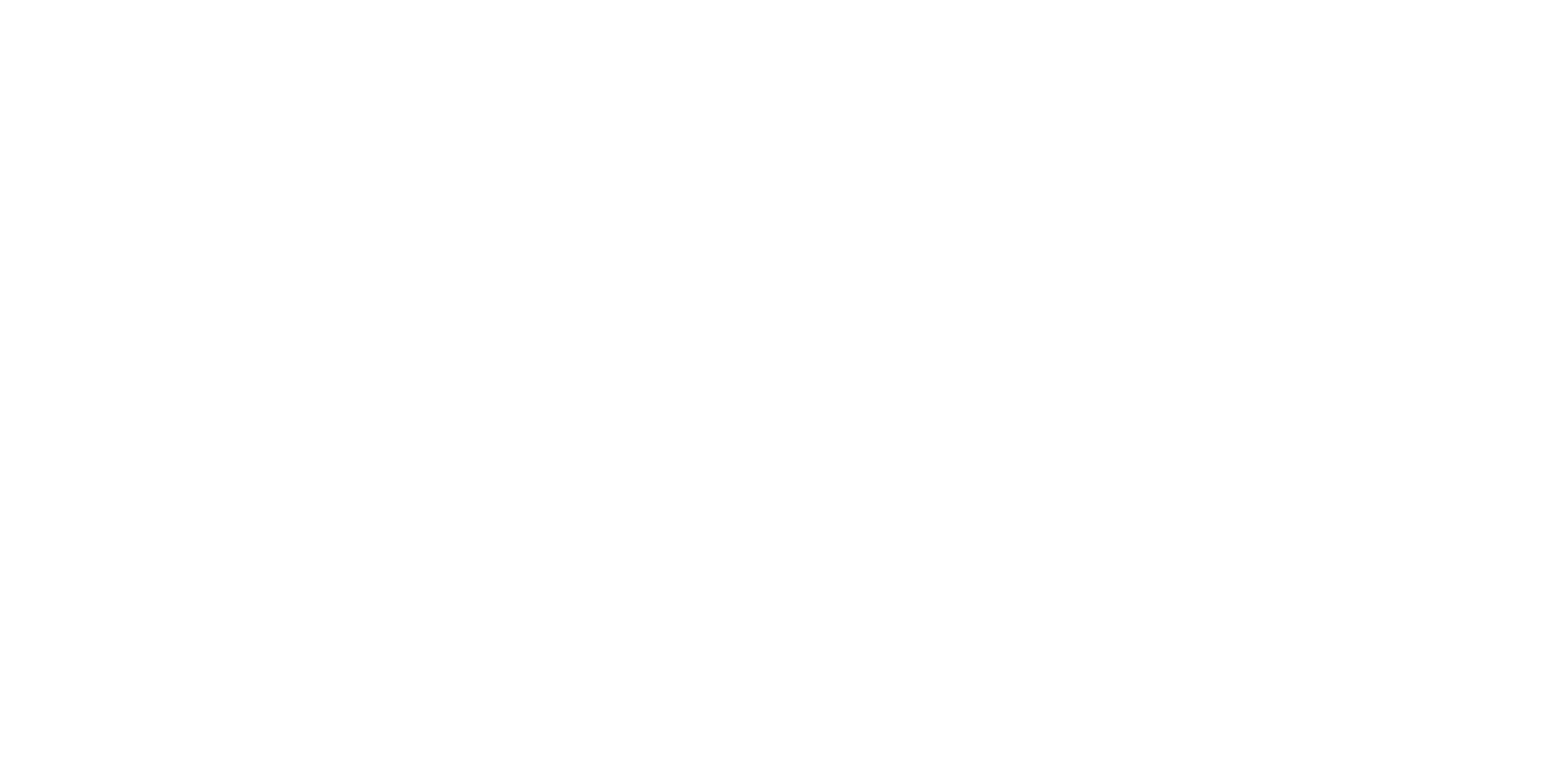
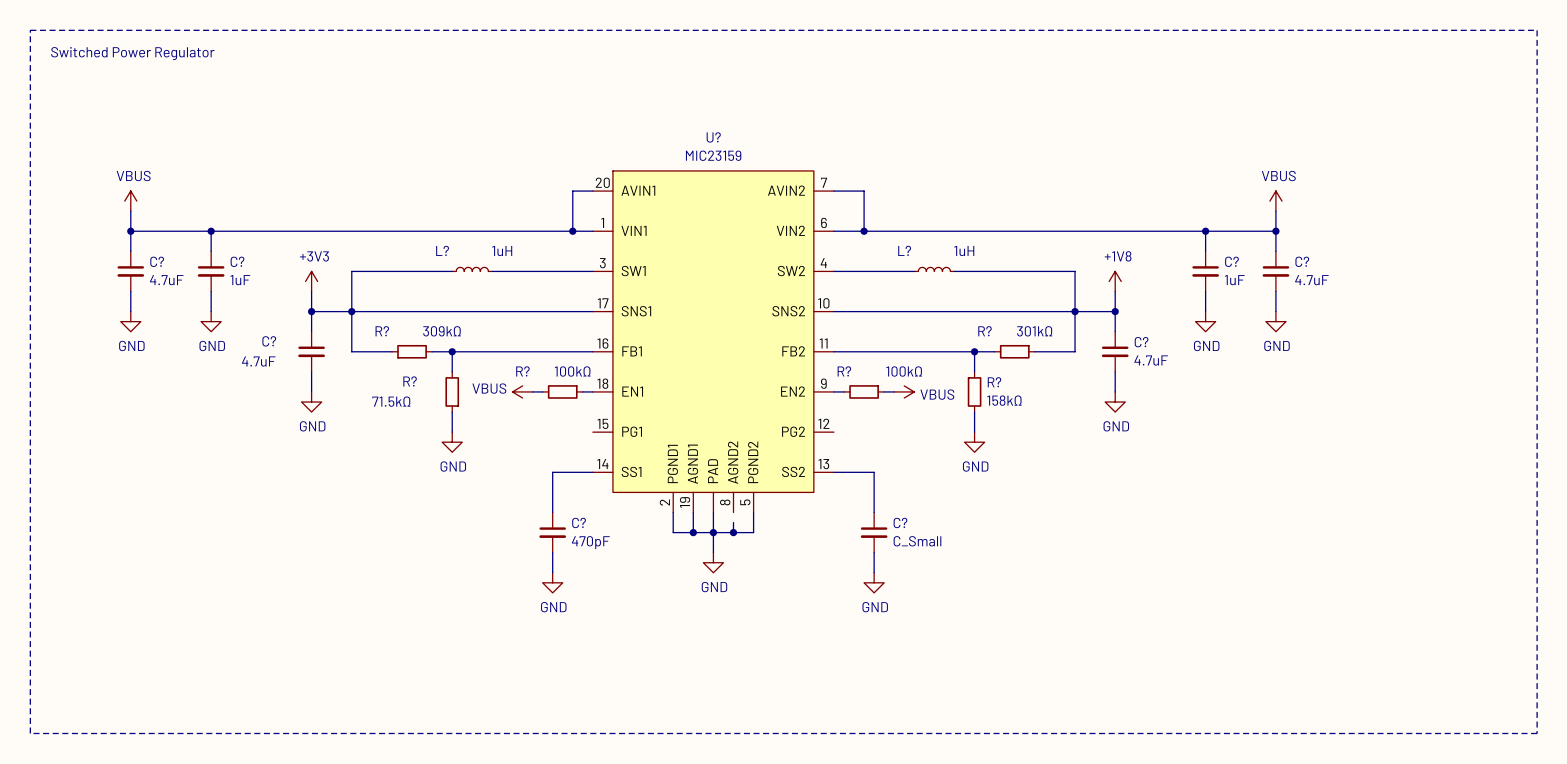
line: none -> (30, 30) (1537, 30) (1537, 733) (30, 733) (30, 30)
text: none -> Switched Power Regulator (132, 53)
wire: none -> (592, 191) (572, 191) (572, 231)
wire: none -> (833, 191) (864, 191) (864, 231)
power symbol: none -> VBUS (130, 201)
power symbol: none -> VBUS (1275, 201)
wire: none -> (130, 211) (130, 251)
wire: none -> (1275, 211) (1275, 251)
wire: none -> (130, 231) (592, 231)
junction: none -> (130, 231)
wire: none -> (211, 231) (211, 251)
junction: none -> (211, 231)
junction: none -> (572, 231)
wire: none -> (833, 231) (1275, 231)
junction: none -> (864, 231)
wire: none -> (1205, 231) (1205, 251)
junction: none -> (1205, 231)
junction: none -> (1275, 231)
L?: none -> 1uH (472, 269)
L?: none -> 1uH (934, 269)
C?: none -> 4.7uF (130, 271)
C?: none -> 1uF (211, 271)
wire: none -> (452, 271) (351, 271) (351, 351) (391, 351)
wire: none -> (492, 271) (592, 271)
wire: none -> (833, 271) (914, 271)
wire: none -> (954, 271) (1075, 271) (1075, 351) (1034, 351)
C?: none -> 1uF (1205, 271)
C?: none -> 4.7uF (1275, 271)
power symbol: none -> +3V3 (311, 281)
power symbol: none -> +1V8 (1115, 281)
wire: none -> (130, 291) (130, 311)
wire: none -> (211, 291) (211, 311)
wire: none -> (311, 291) (311, 331)
wire: none -> (1115, 291) (1115, 331)
wire: none -> (1205, 291) (1205, 311)
wire: none -> (1275, 291) (1275, 311)
wire: none -> (311, 311) (592, 311)
junction: none -> (311, 311)
junction: none -> (351, 311)
wire: none -> (833, 311) (1115, 311)
junction: none -> (1075, 311)
junction: none -> (1115, 311)
power symbol: none -> GND (130, 321)
power symbol: none -> GND (211, 321)
power symbol: none -> GND (1205, 321)
power symbol: none -> GND (1275, 321)
U?: none -> MIC23159 (713, 341)
C?: none -> 4.7uF (311, 351)
R?: none -> 309kΩ (412, 351)
wire: none -> (432, 351) (592, 351)
wire: none -> (452, 351) (452, 371)
junction: none -> (452, 351)
wire: none -> (833, 351) (994, 351)
wire: none -> (974, 351) (974, 371)
junction: none -> (974, 351)
R?: none -> 301kΩ (1014, 351)
C?: none -> 4.7uF (1115, 351)
wire: none -> (311, 371) (311, 391)
wire: none -> (1115, 371) (1115, 391)
R?: none -> 71.5kΩ (452, 391)
power symbol: none -> VBUS (522, 391)
wire: none -> (532, 391) (542, 391)
R?: none -> 100kΩ (562, 391)
wire: none -> (582, 391) (592, 391)
wire: none -> (833, 391) (843, 391)
R?: none -> 100kΩ (864, 391)
wire: none -> (884, 391) (894, 391)
power symbol: none -> VBUS (904, 391)
R?: none -> 158kΩ (974, 391)
power symbol: none -> GND (311, 402)
power symbol: none -> GND (1115, 402)
wire: none -> (452, 412) (452, 432)
wire: none -> (974, 412) (974, 432)
power symbol: none -> GND (452, 442)
power symbol: none -> GND (974, 442)
wire: none -> (592, 472) (552, 472) (552, 512)
wire: none -> (833, 472) (874, 472) (874, 512)
wire: none -> (673, 512) (673, 532) (753, 532) (753, 512)
wire: none -> (693, 512) (693, 532)
wire: none -> (713, 512) (713, 552)
wire: none -> (733, 522) (733, 532)
C?: none -> 470pF (552, 532)
junction: none -> (693, 532)
junction: none -> (713, 532)
junction: none -> (733, 532)
C?: none -> C_Small (874, 532)
wire: none -> (552, 552) (552, 572)
wire: none -> (874, 552) (874, 572)
power symbol: none -> GND (713, 562)
power symbol: none -> GND (552, 582)
power symbol: none -> GND (874, 582)

